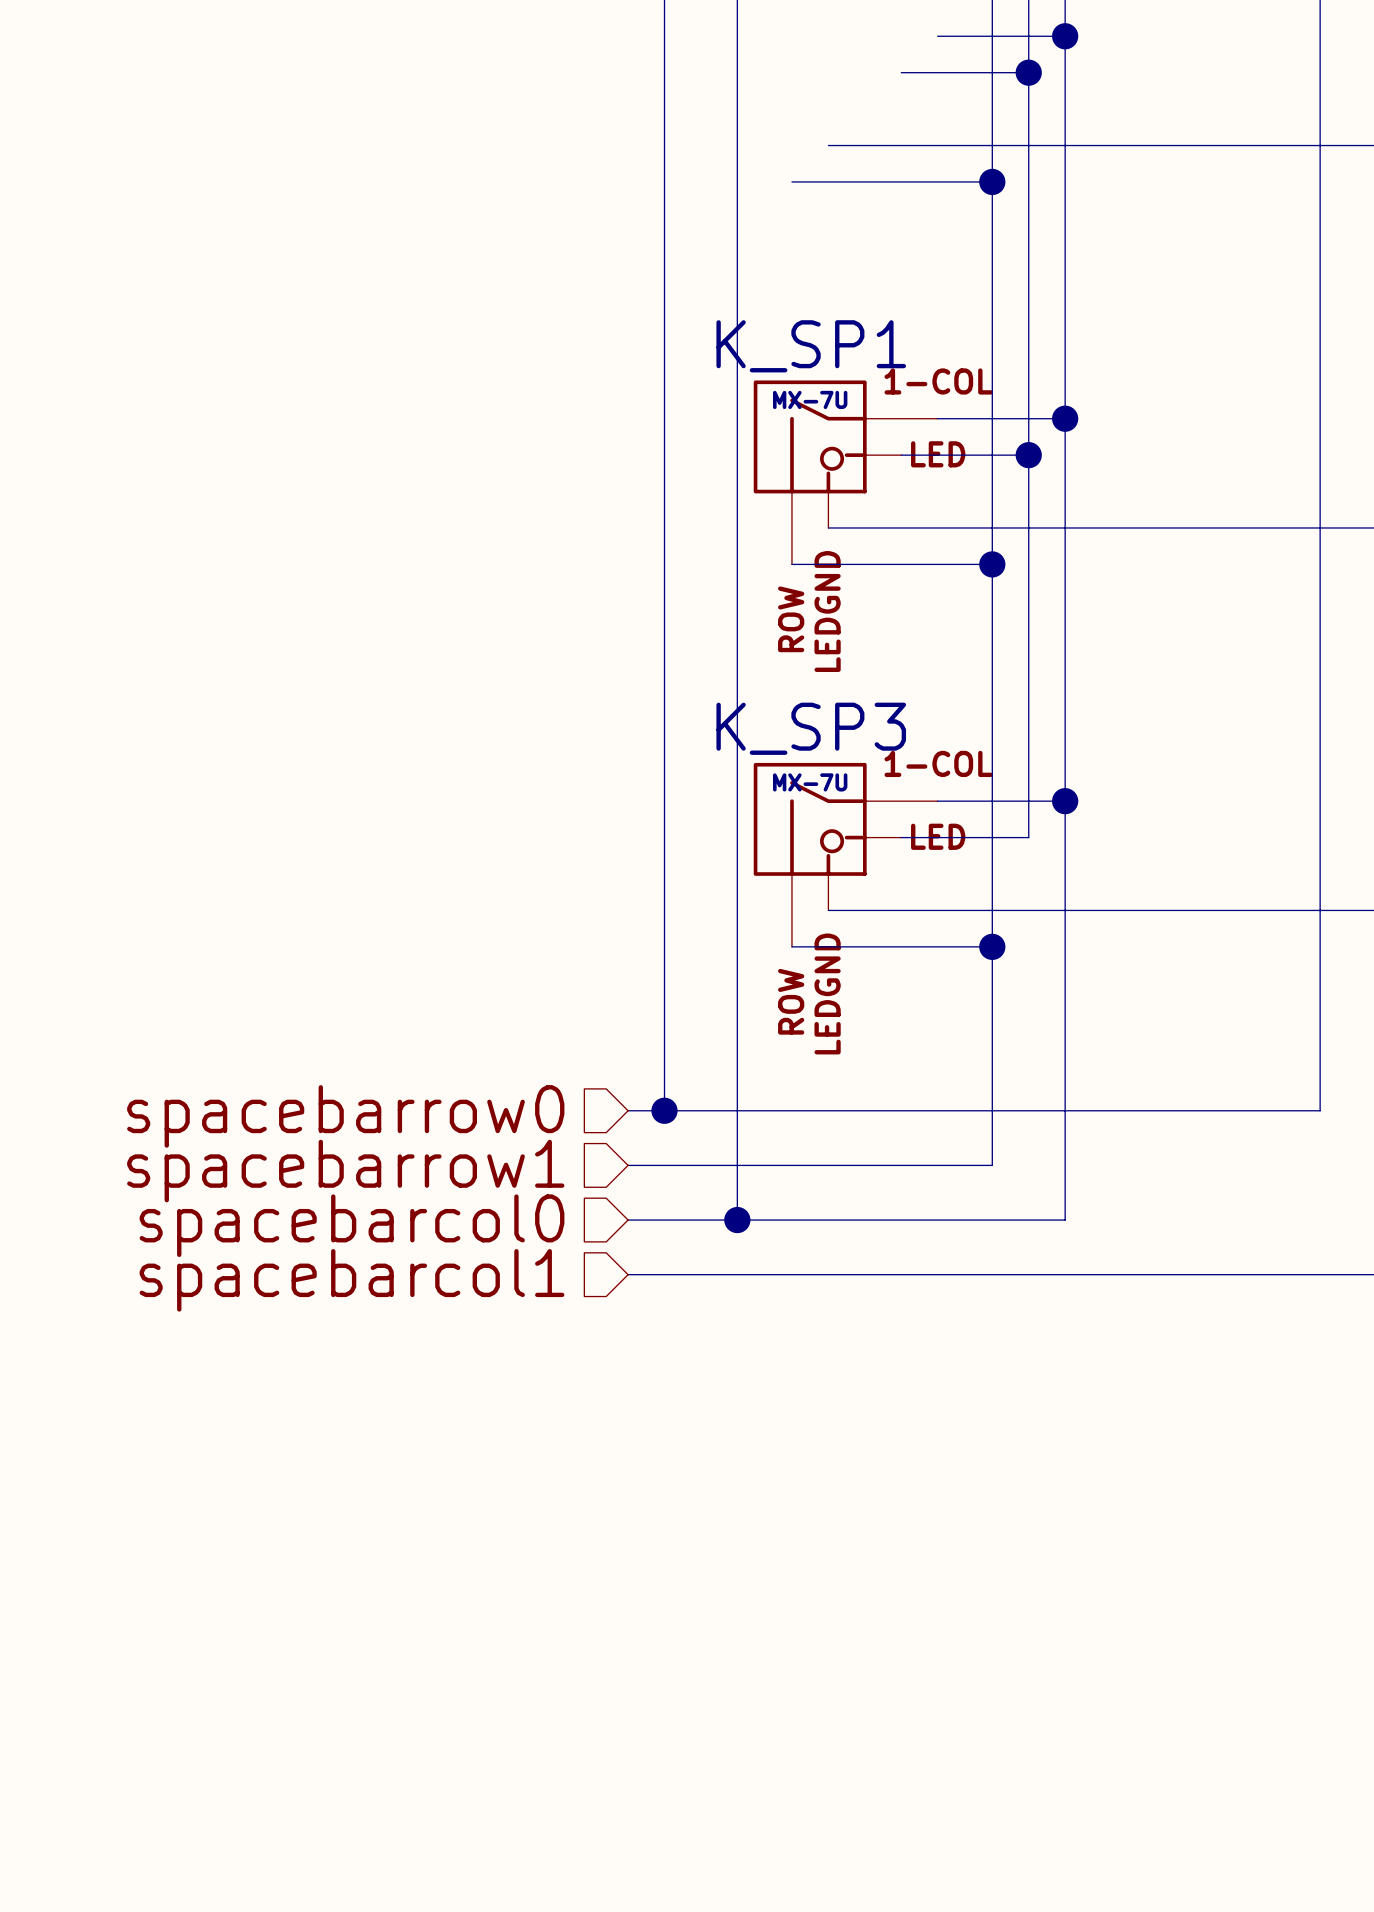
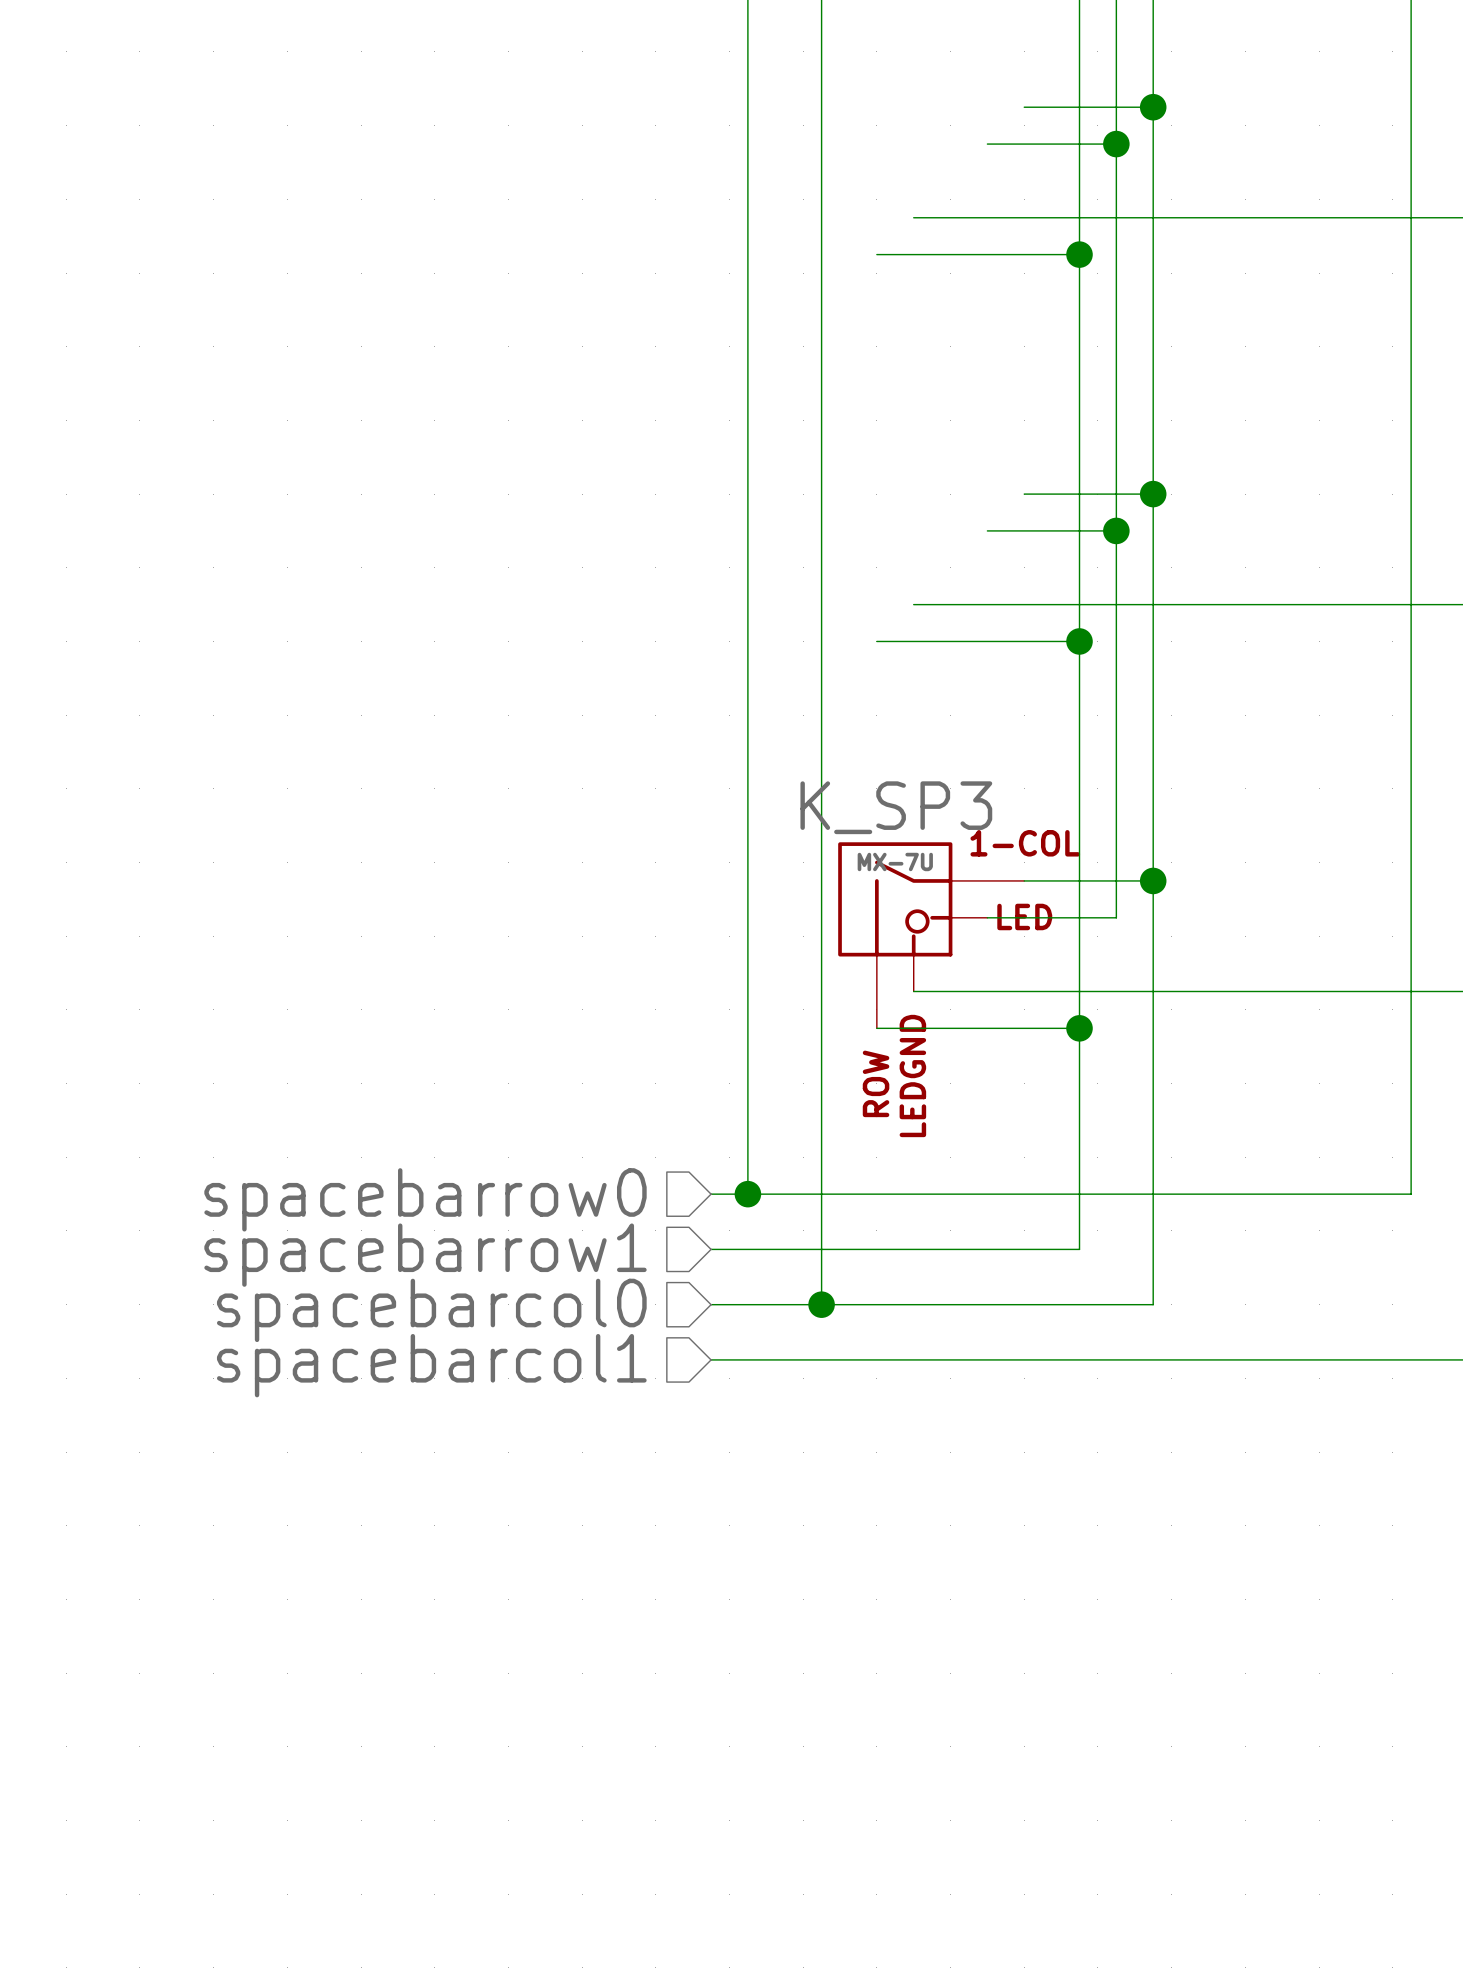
K_SP1: MX-7U (845, 472) -> none

